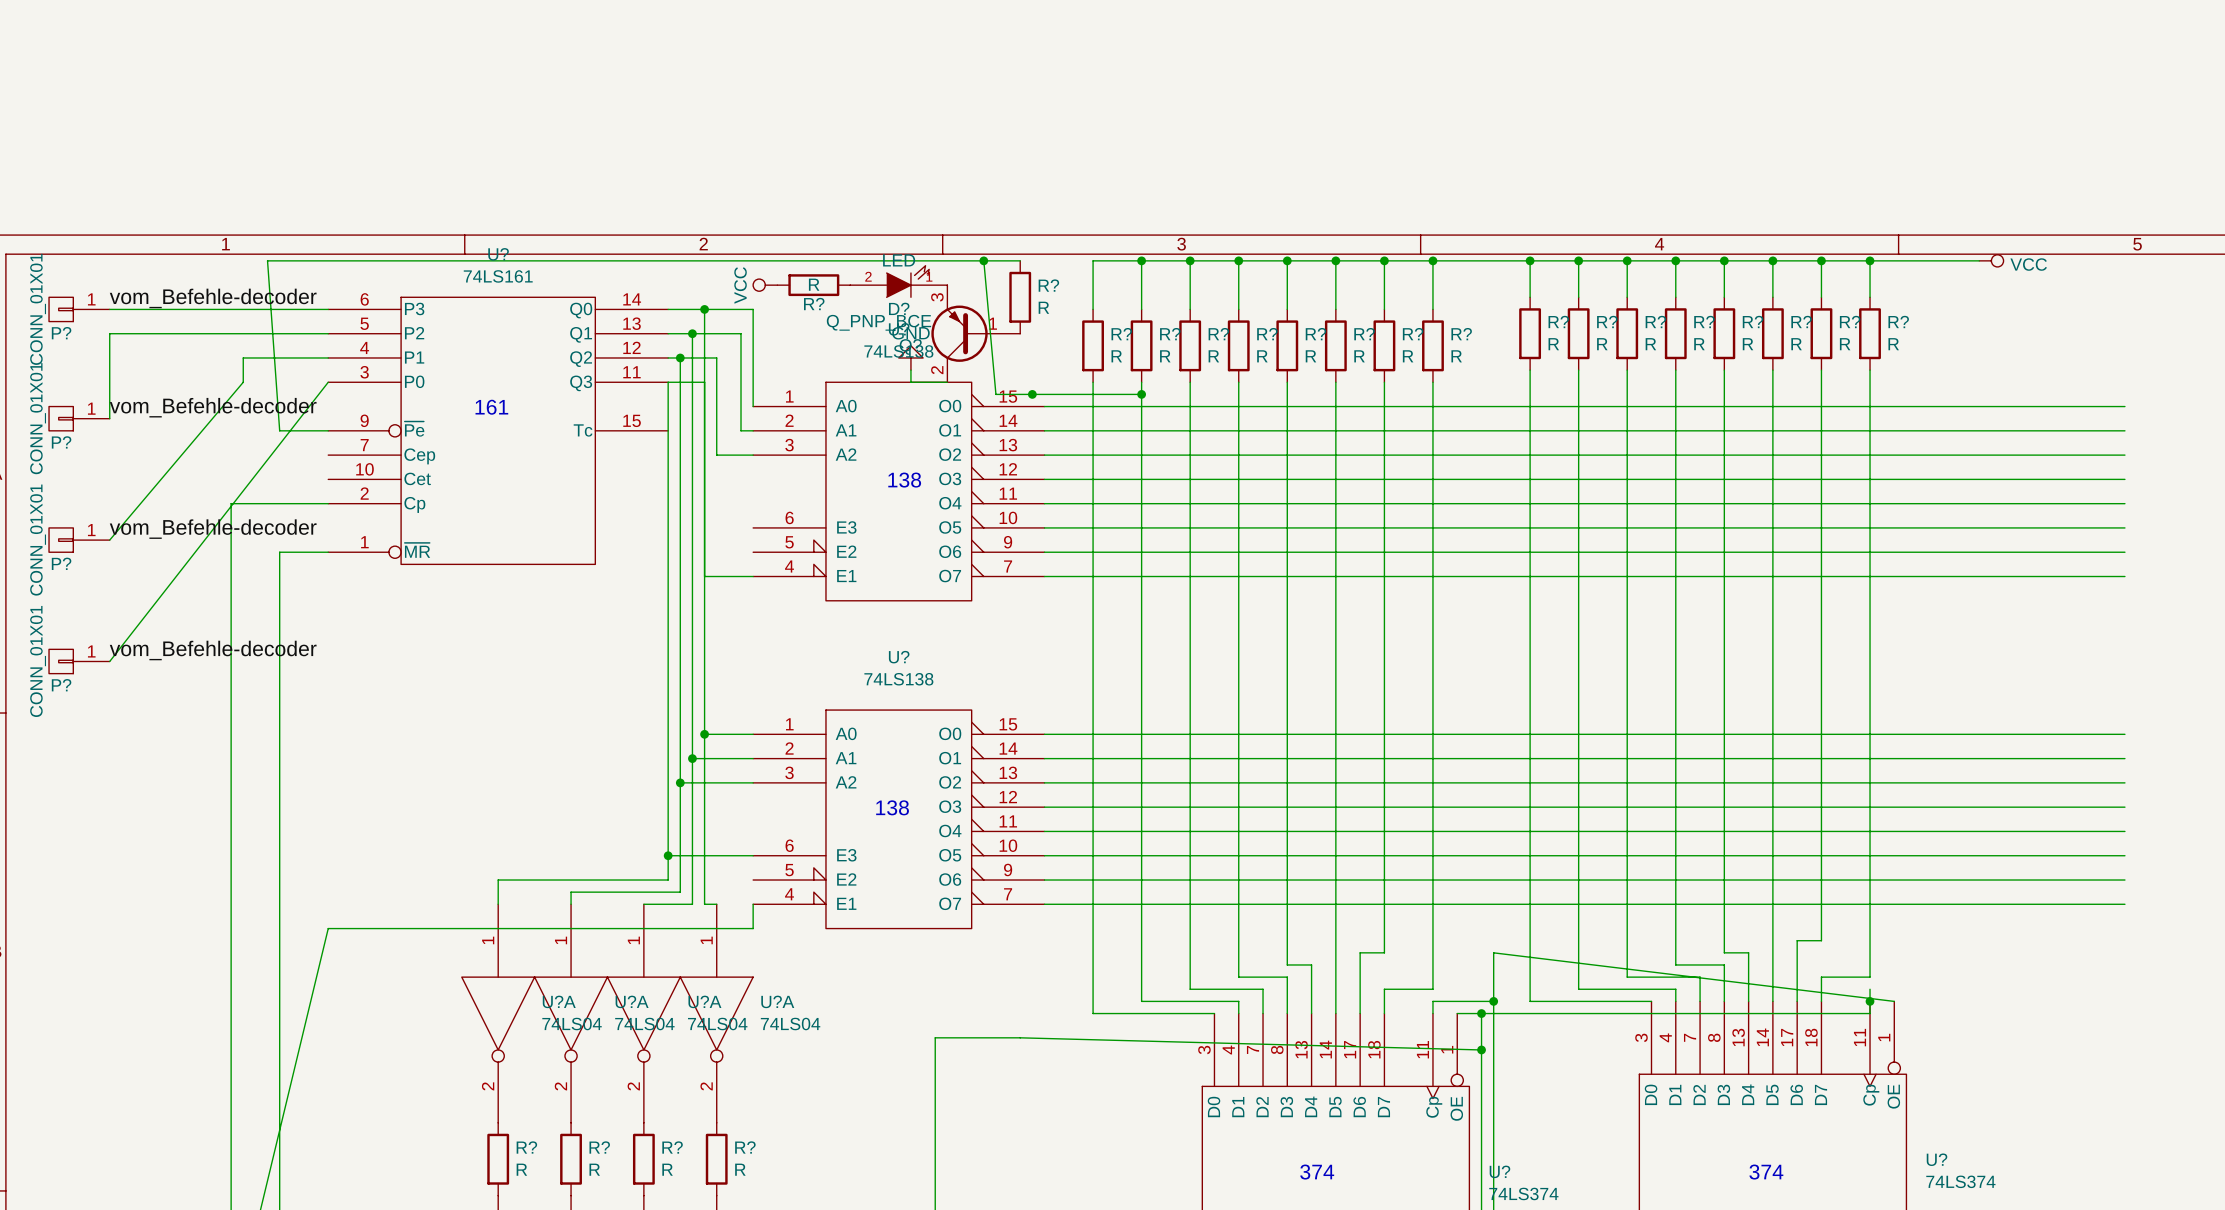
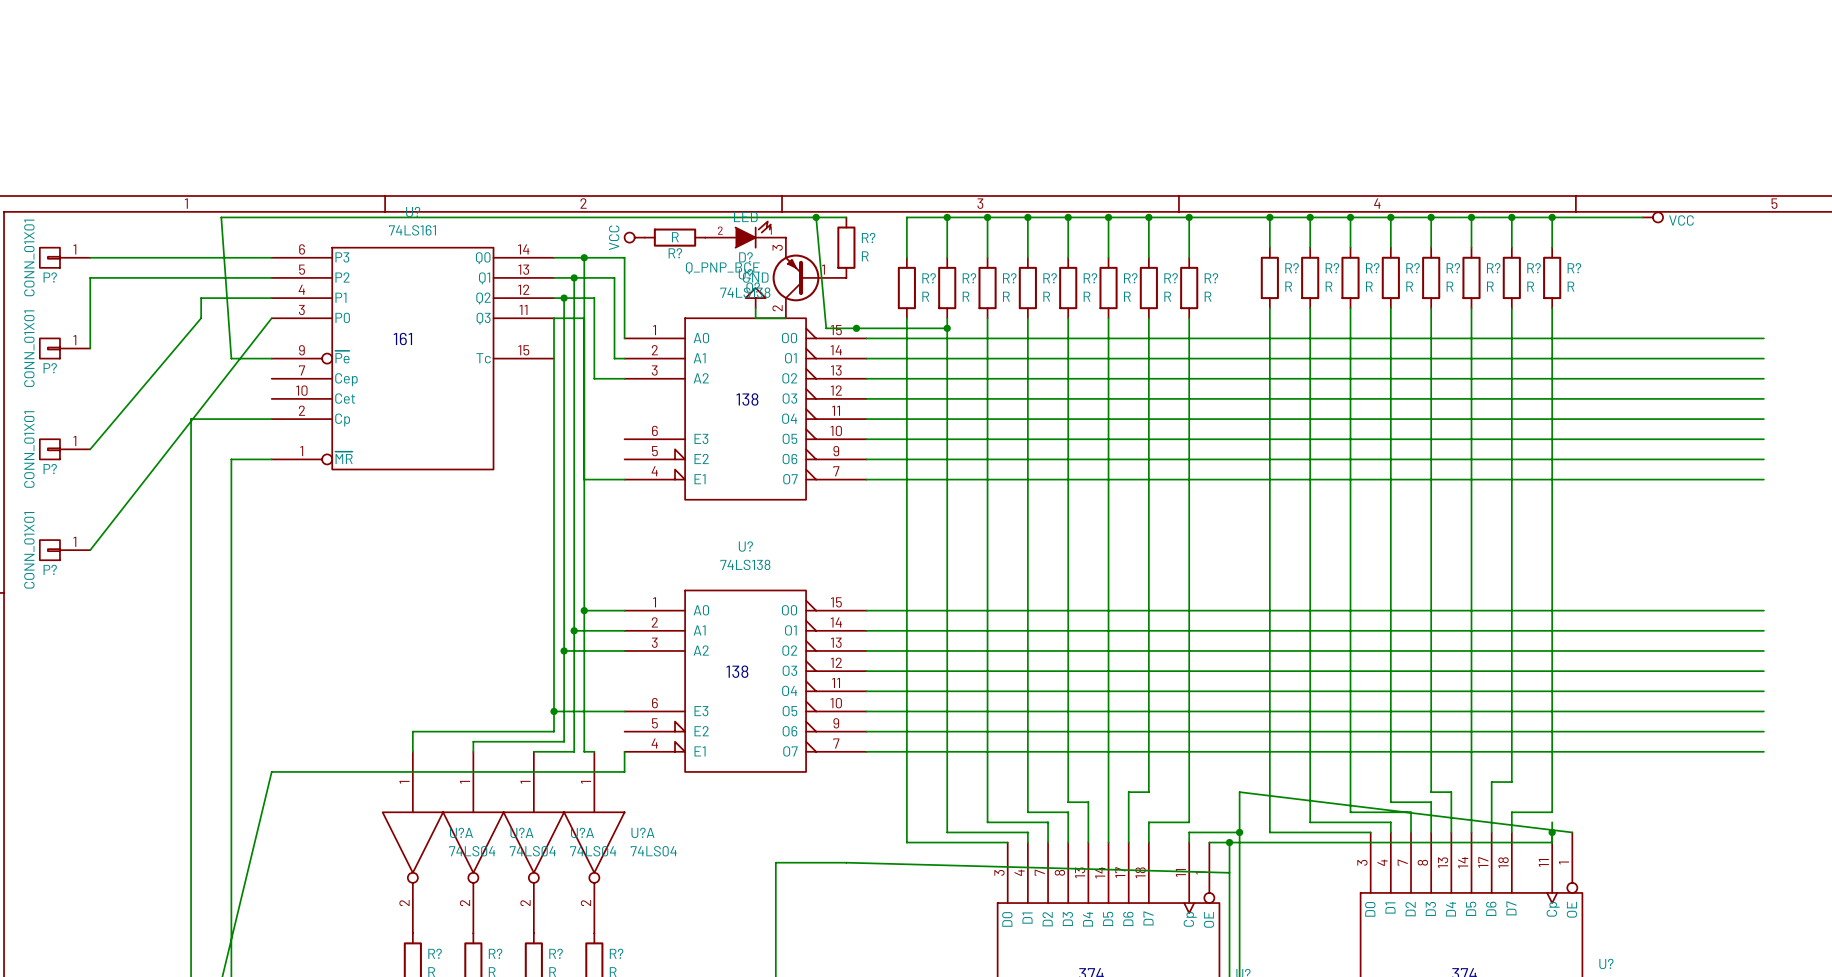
label: vom_Befehle-decoder (213, 298) -> none
label: vom_Befehle-decoder (213, 407) -> none
label: vom_Befehle-decoder (213, 529) -> none
label: vom_Befehle-decoder (213, 650) -> none
junction: (1481, 1049) -> none

